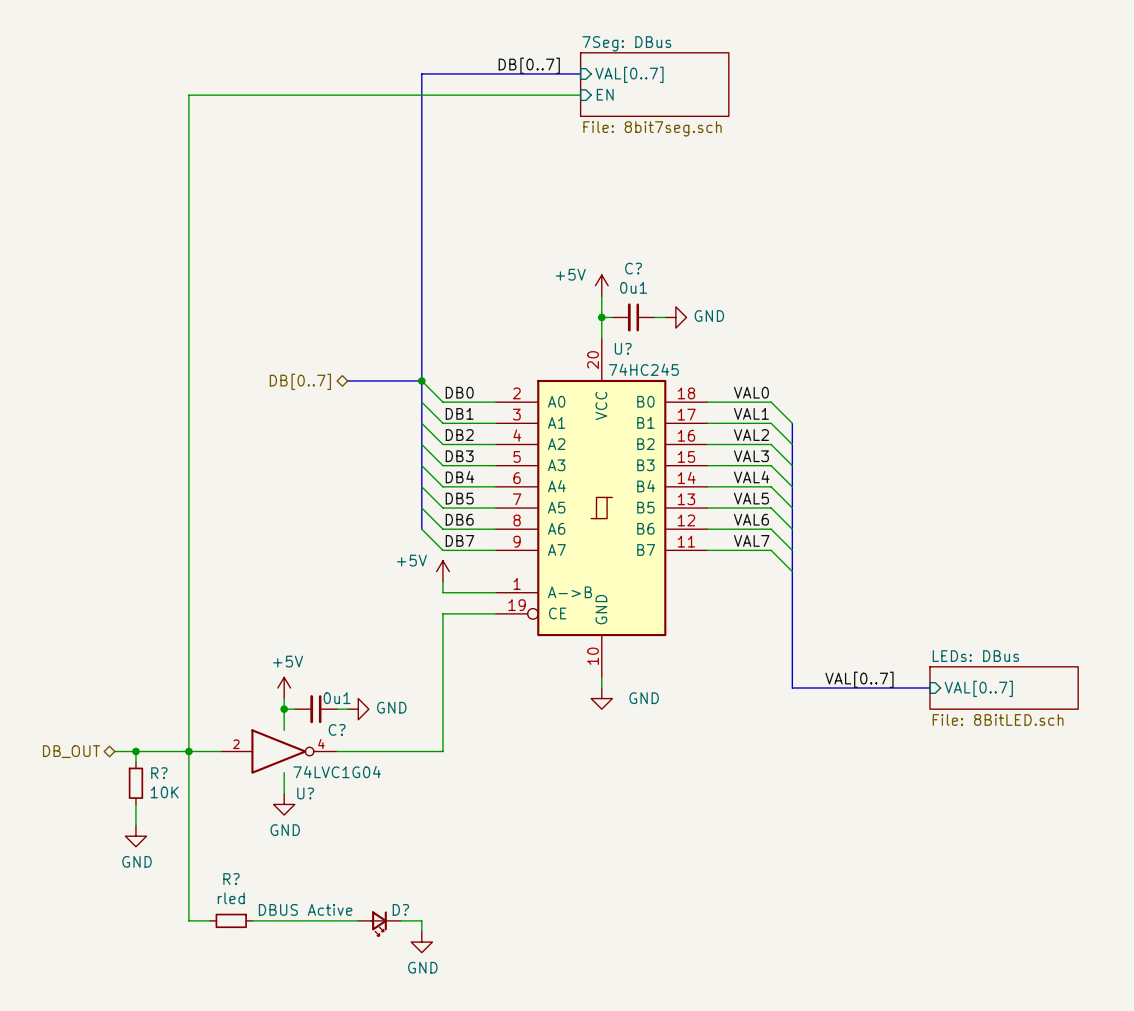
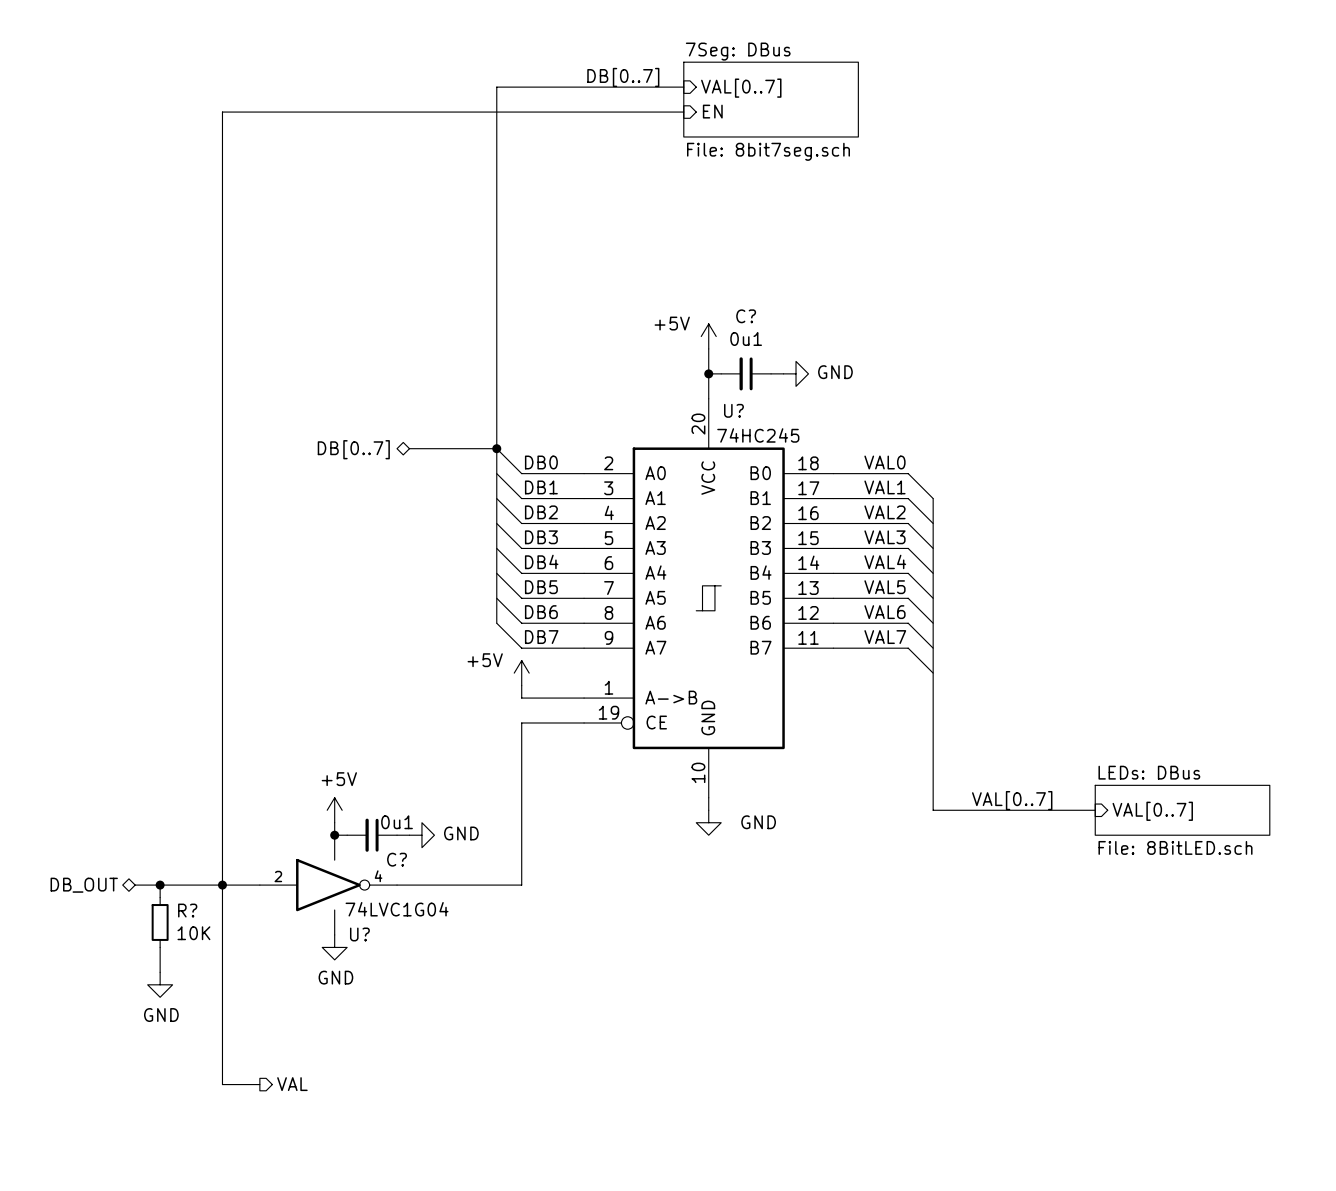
R?: rled (231, 920) -> none
sheet pin: none -> VAL (292, 1084)
wire: (252, 920) (358, 920) -> none
wire: (400, 920) (421, 920) (421, 931) -> none
D?: DBUS Active (379, 923) -> none
power symbol: GND (421, 942) -> none

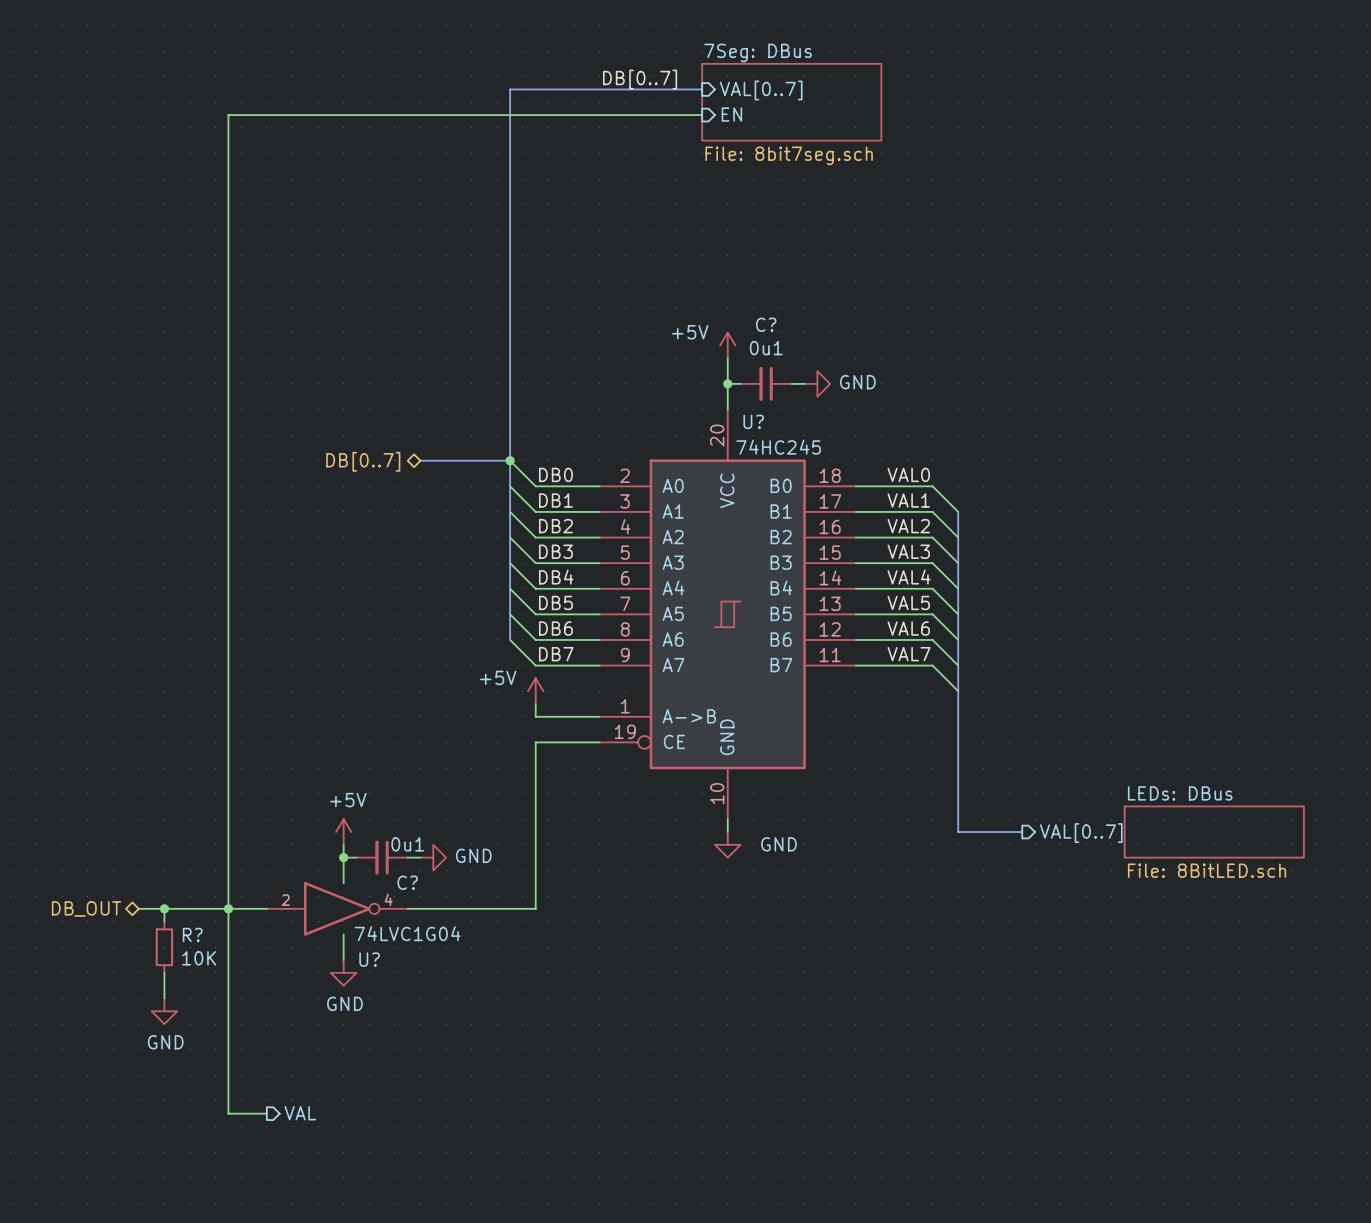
label: VAL[0..7] (1012, 800) -> none
bus: (995, 810) (1095, 810) -> none
sheet pin position: VAL[0..7] (1152, 811) -> VAL[0..7] (1081, 833)

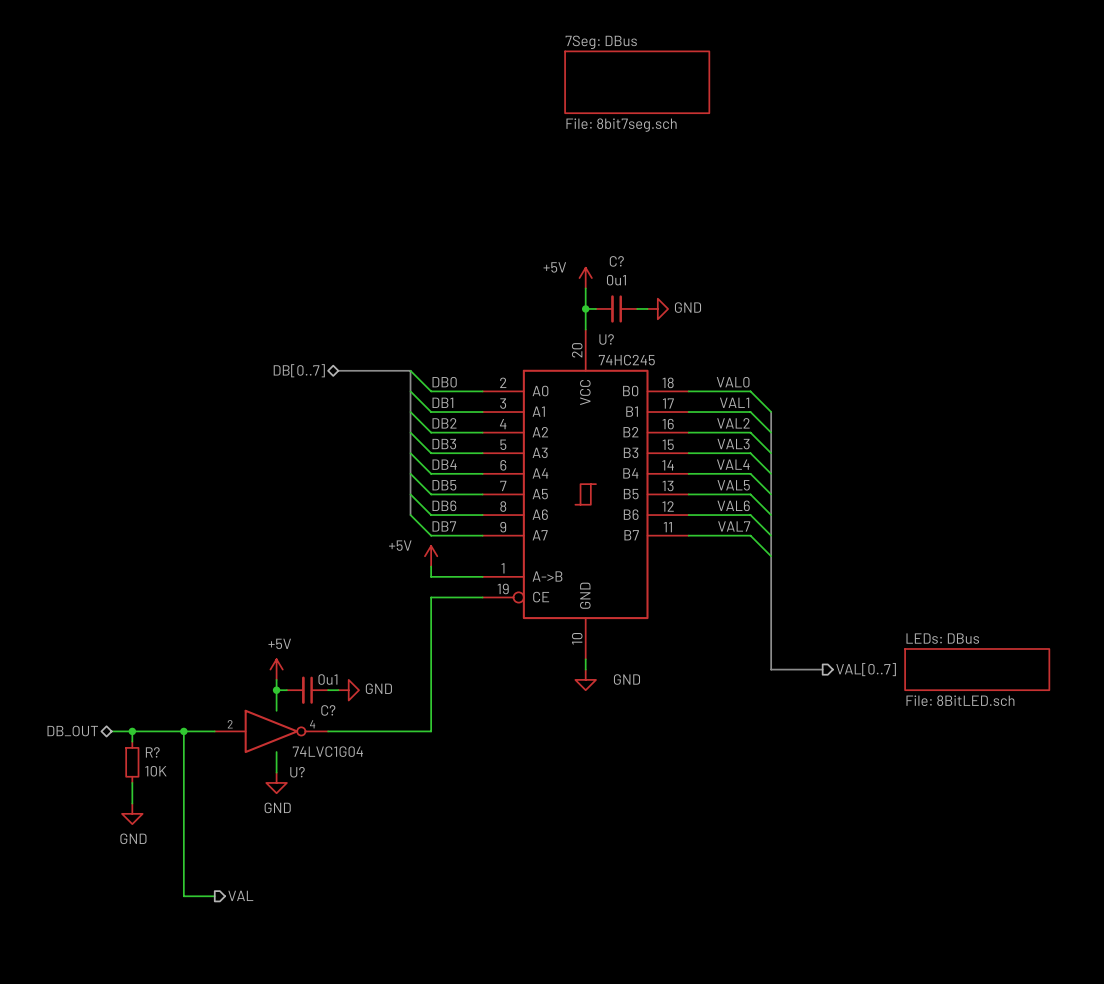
label: DB[0..7] (640, 79) -> none
bus: (702, 89) (510, 89) (510, 460) -> none
sheet pin: VAL[0..7] (761, 90) -> none
sheet pin: EN (731, 114) -> none
wire: (702, 115) (228, 115) (228, 908) -> none
junction: (510, 460) -> none

